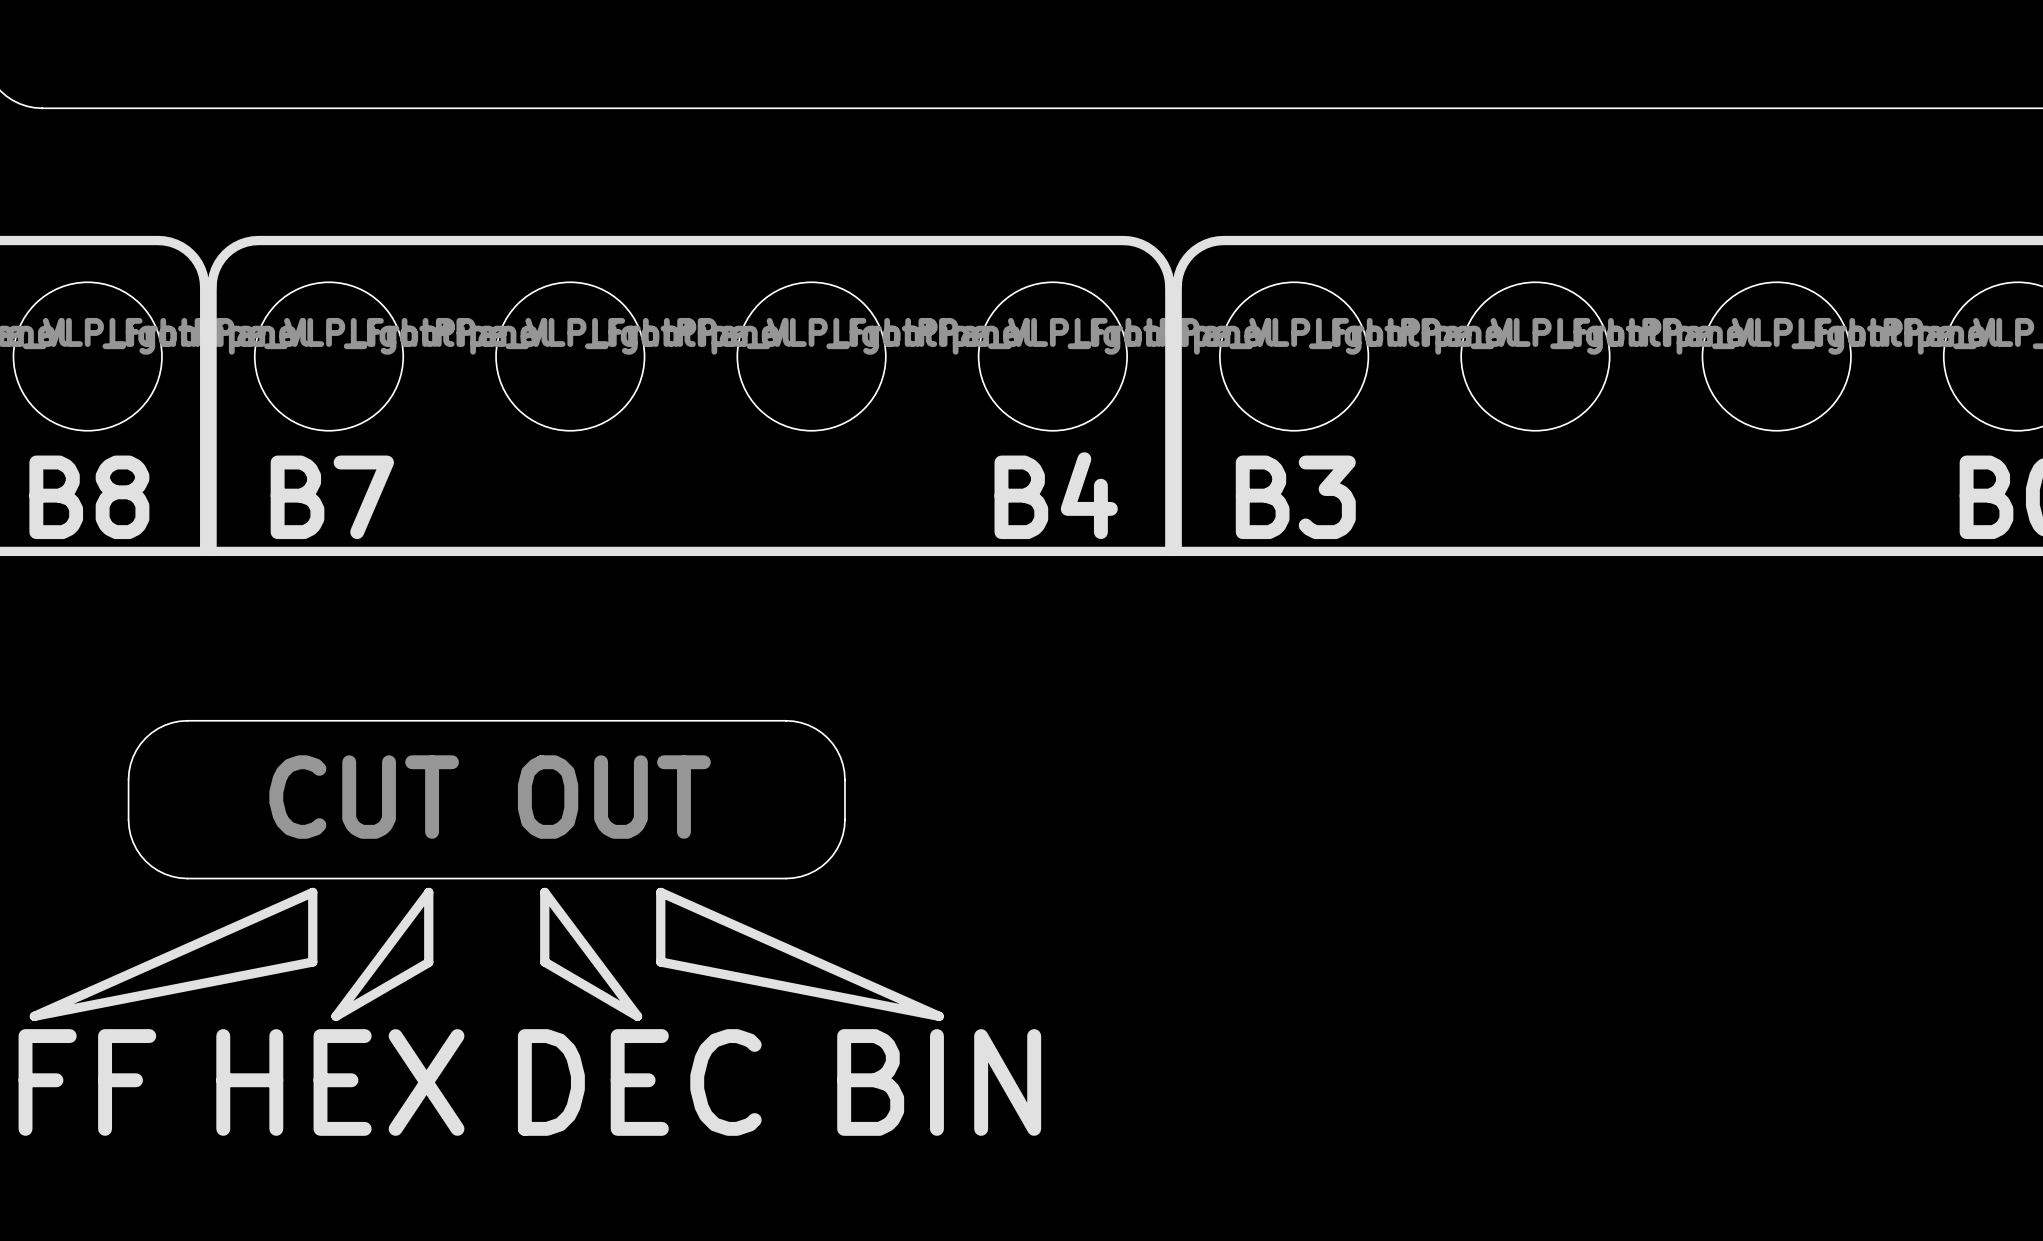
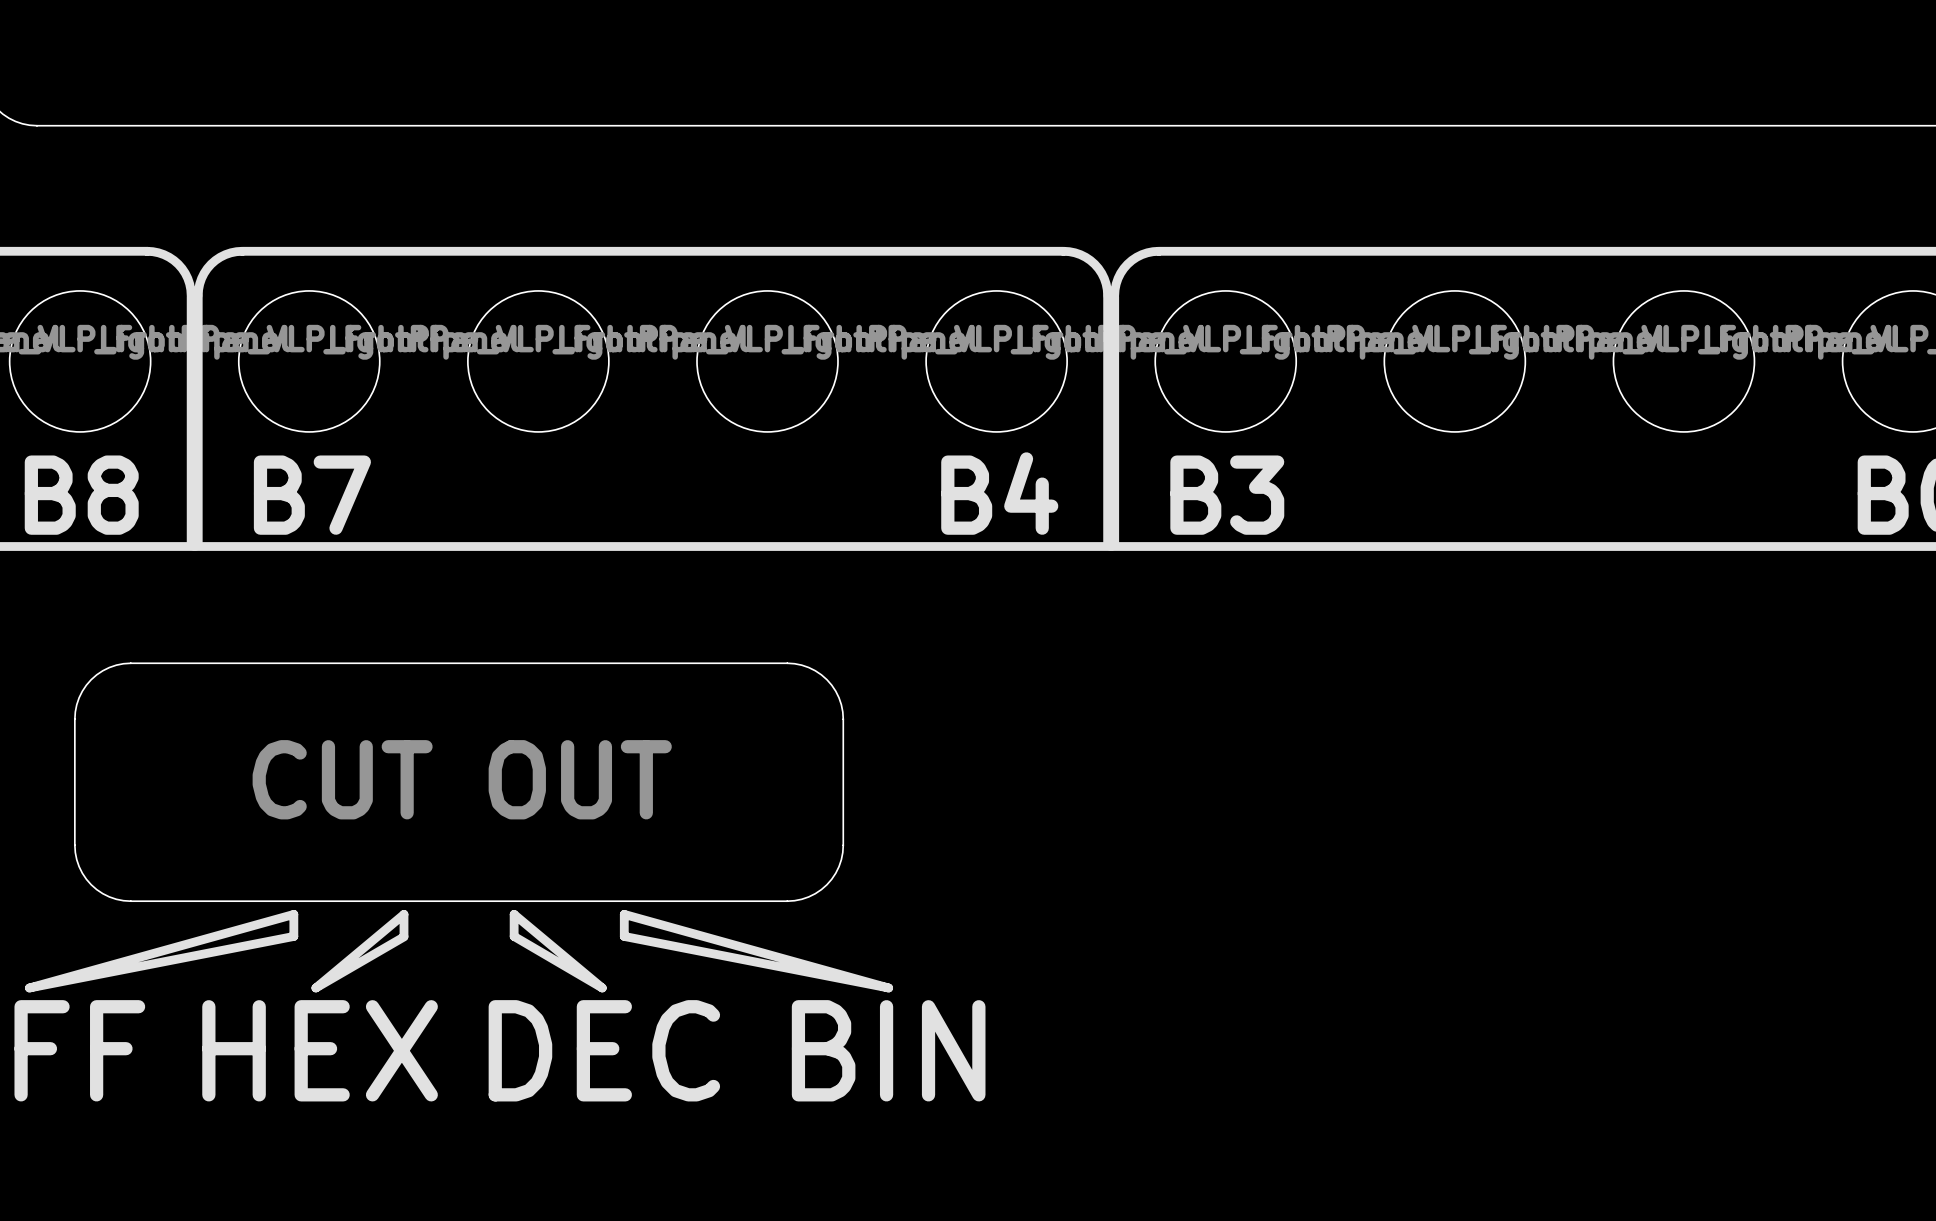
board edge: (187, 720) (793, 721) (808, 725) (821, 732) (832, 743) (840, 757) (844, 779) (844, 827) (837, 849) (827, 861) (815, 870) (793, 878) (179, 878) (158, 870) (145, 861) (136, 849) (129, 827) (128, 779) (133, 757) (145, 738) (164, 725) (187, 720) -> (130, 663) (109, 667) (91, 679) (79, 697) (74, 719) (74, 845) (76, 859) (82, 873) (91, 884) (102, 893) (116, 899) (130, 901) (787, 901) (801, 899) (821, 889) (835, 873) (841, 859) (843, 845) (843, 719) (841, 704) (835, 691) (826, 679) (815, 670) (801, 665) (787, 663) (130, 663)
line: (312, 938) (312, 892) (34, 1016) -> (293, 914) (29, 987)
line: (428, 938) (428, 892) (335, 1016) -> (403, 914) (315, 987)
line: (544, 938) (544, 892) (637, 1016) -> (514, 914) (602, 987)
line: (660, 938) (660, 892) (939, 1016) -> (624, 914) (888, 987)

